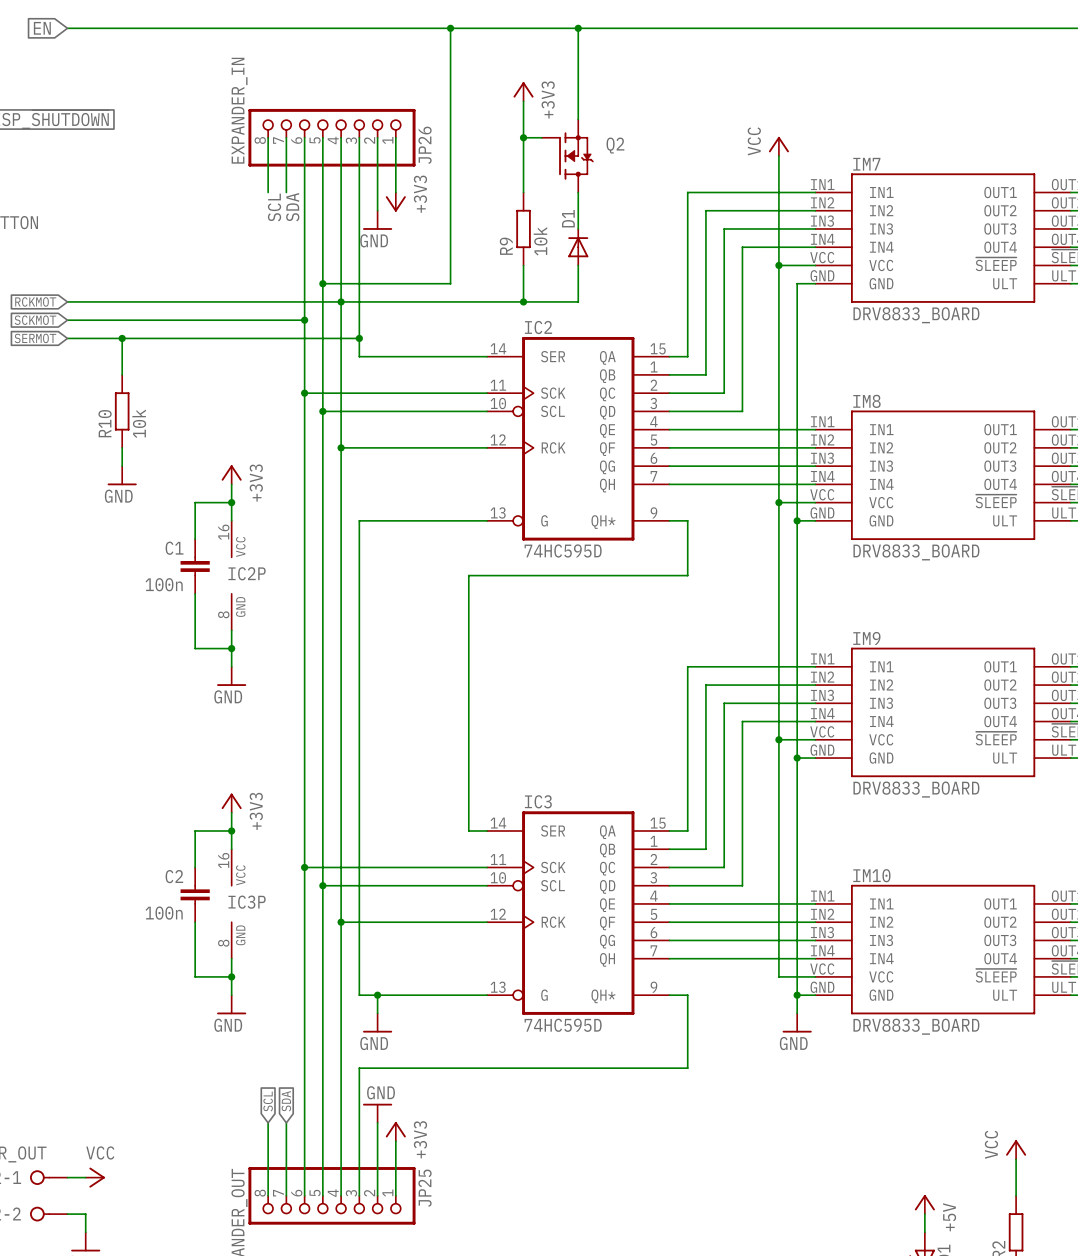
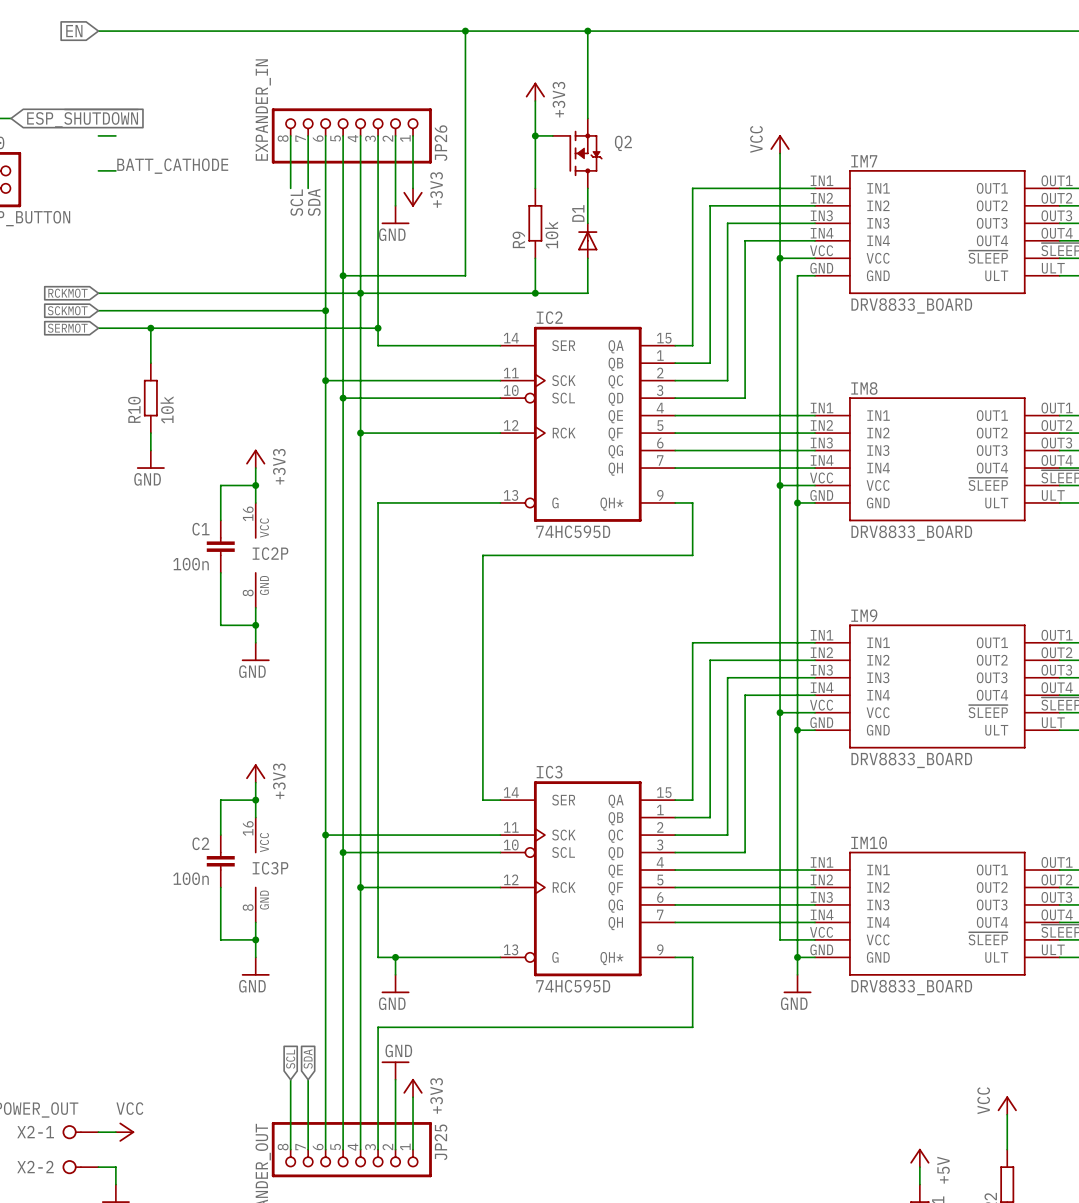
wire: none -> (98, 135) (115, 135)
label: none -> BATT_CATHODE (172, 166)
wire: none -> (98, 170) (115, 170)

